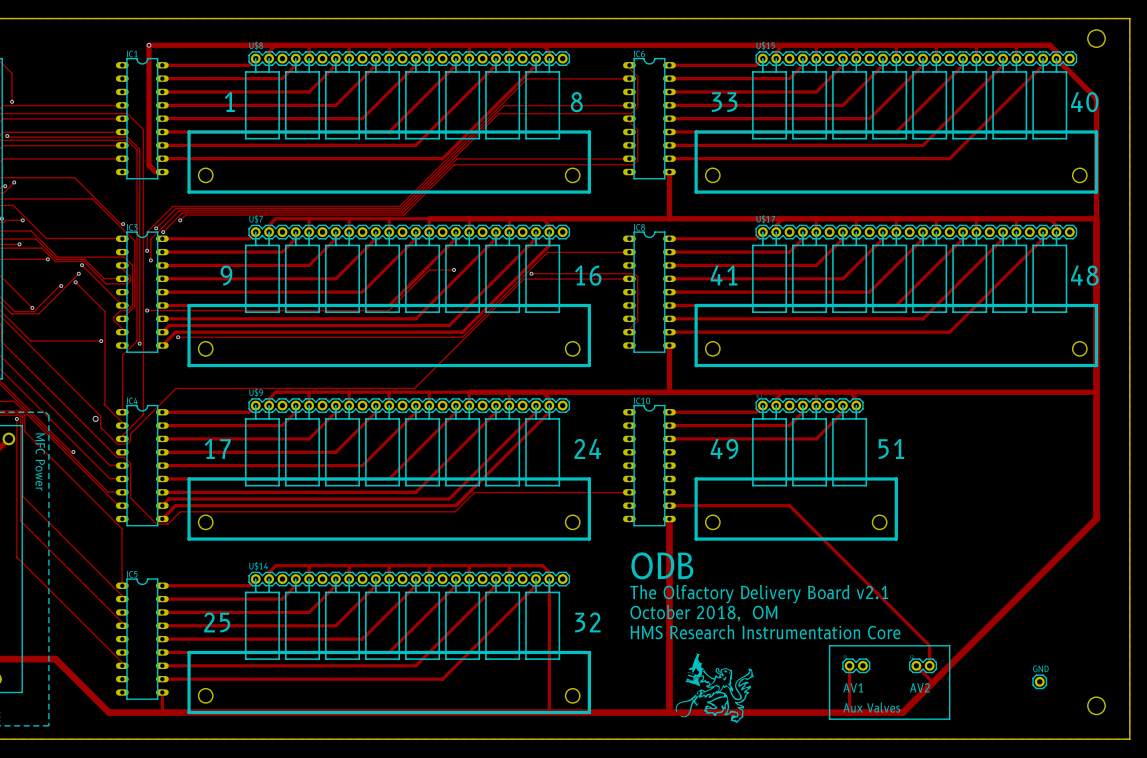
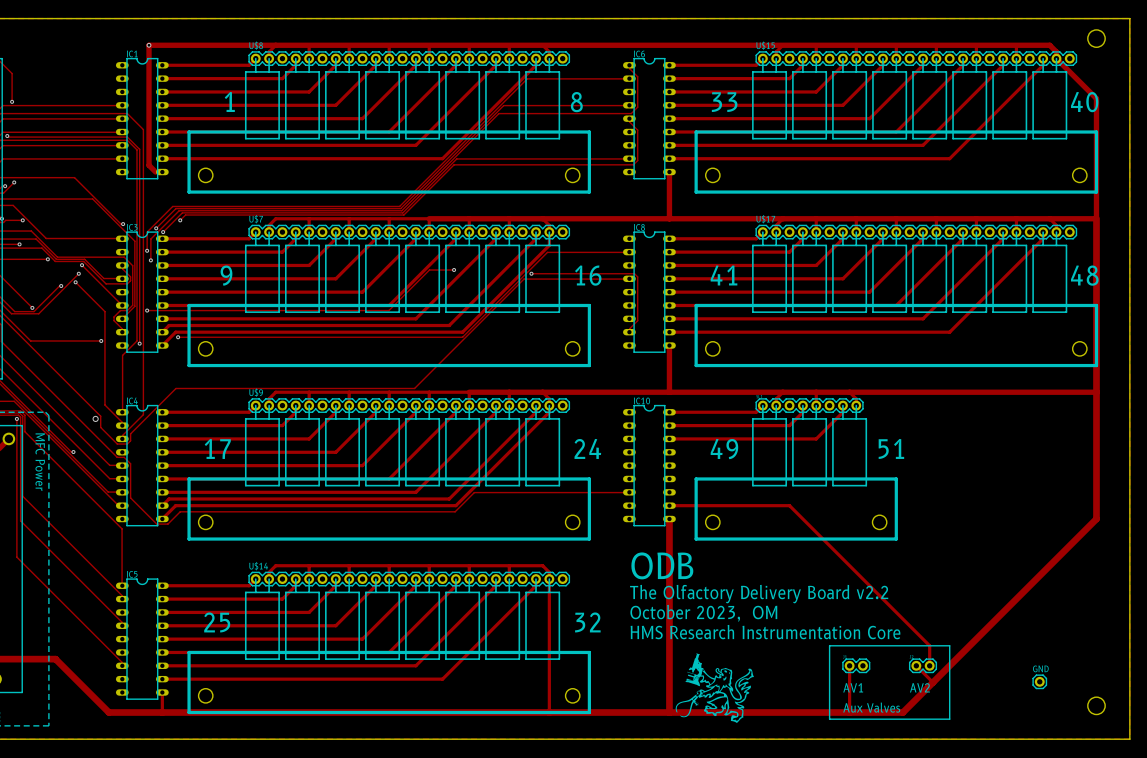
text: The Olfactory Delivery Board v2.1 (759, 594) -> The Olfactory Delivery Board v2.2 (759, 594)
text: October 2018, OM (703, 613) -> October 2023, OM (703, 613)

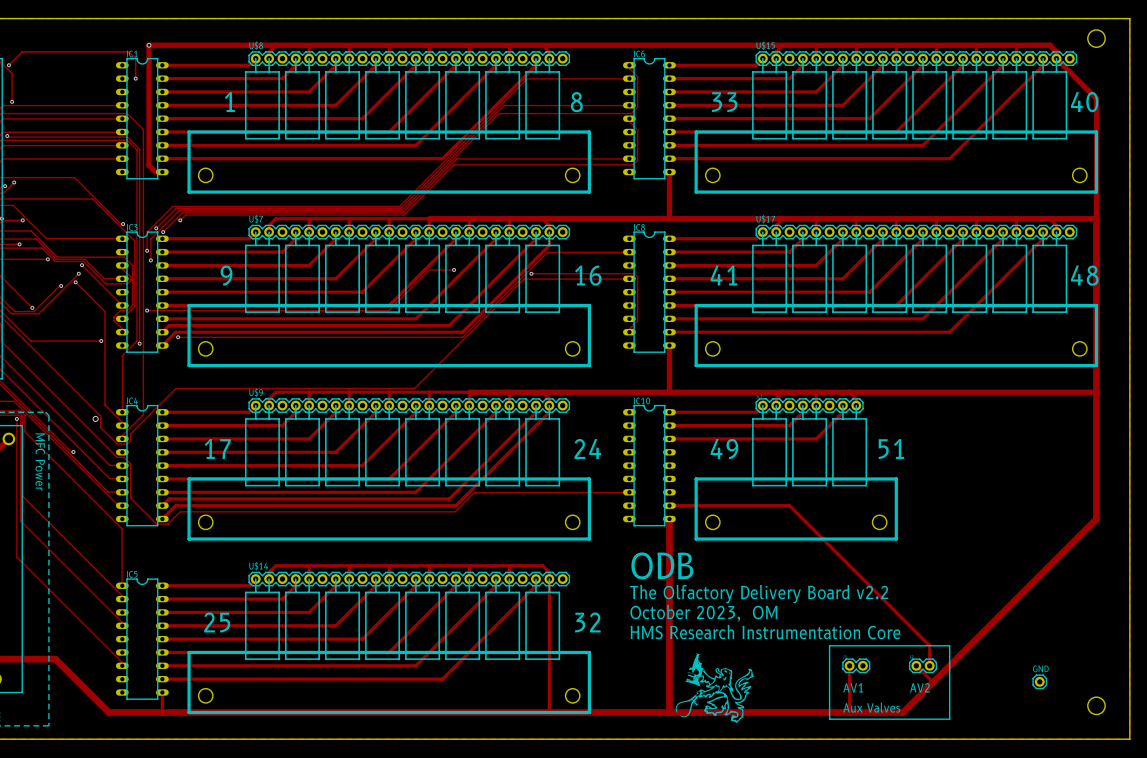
track: none -> (8, 65) (22, 51) (128, 51) (135, 58) (135, 78)
via: none -> (8, 65)
via: none -> (135, 78)

